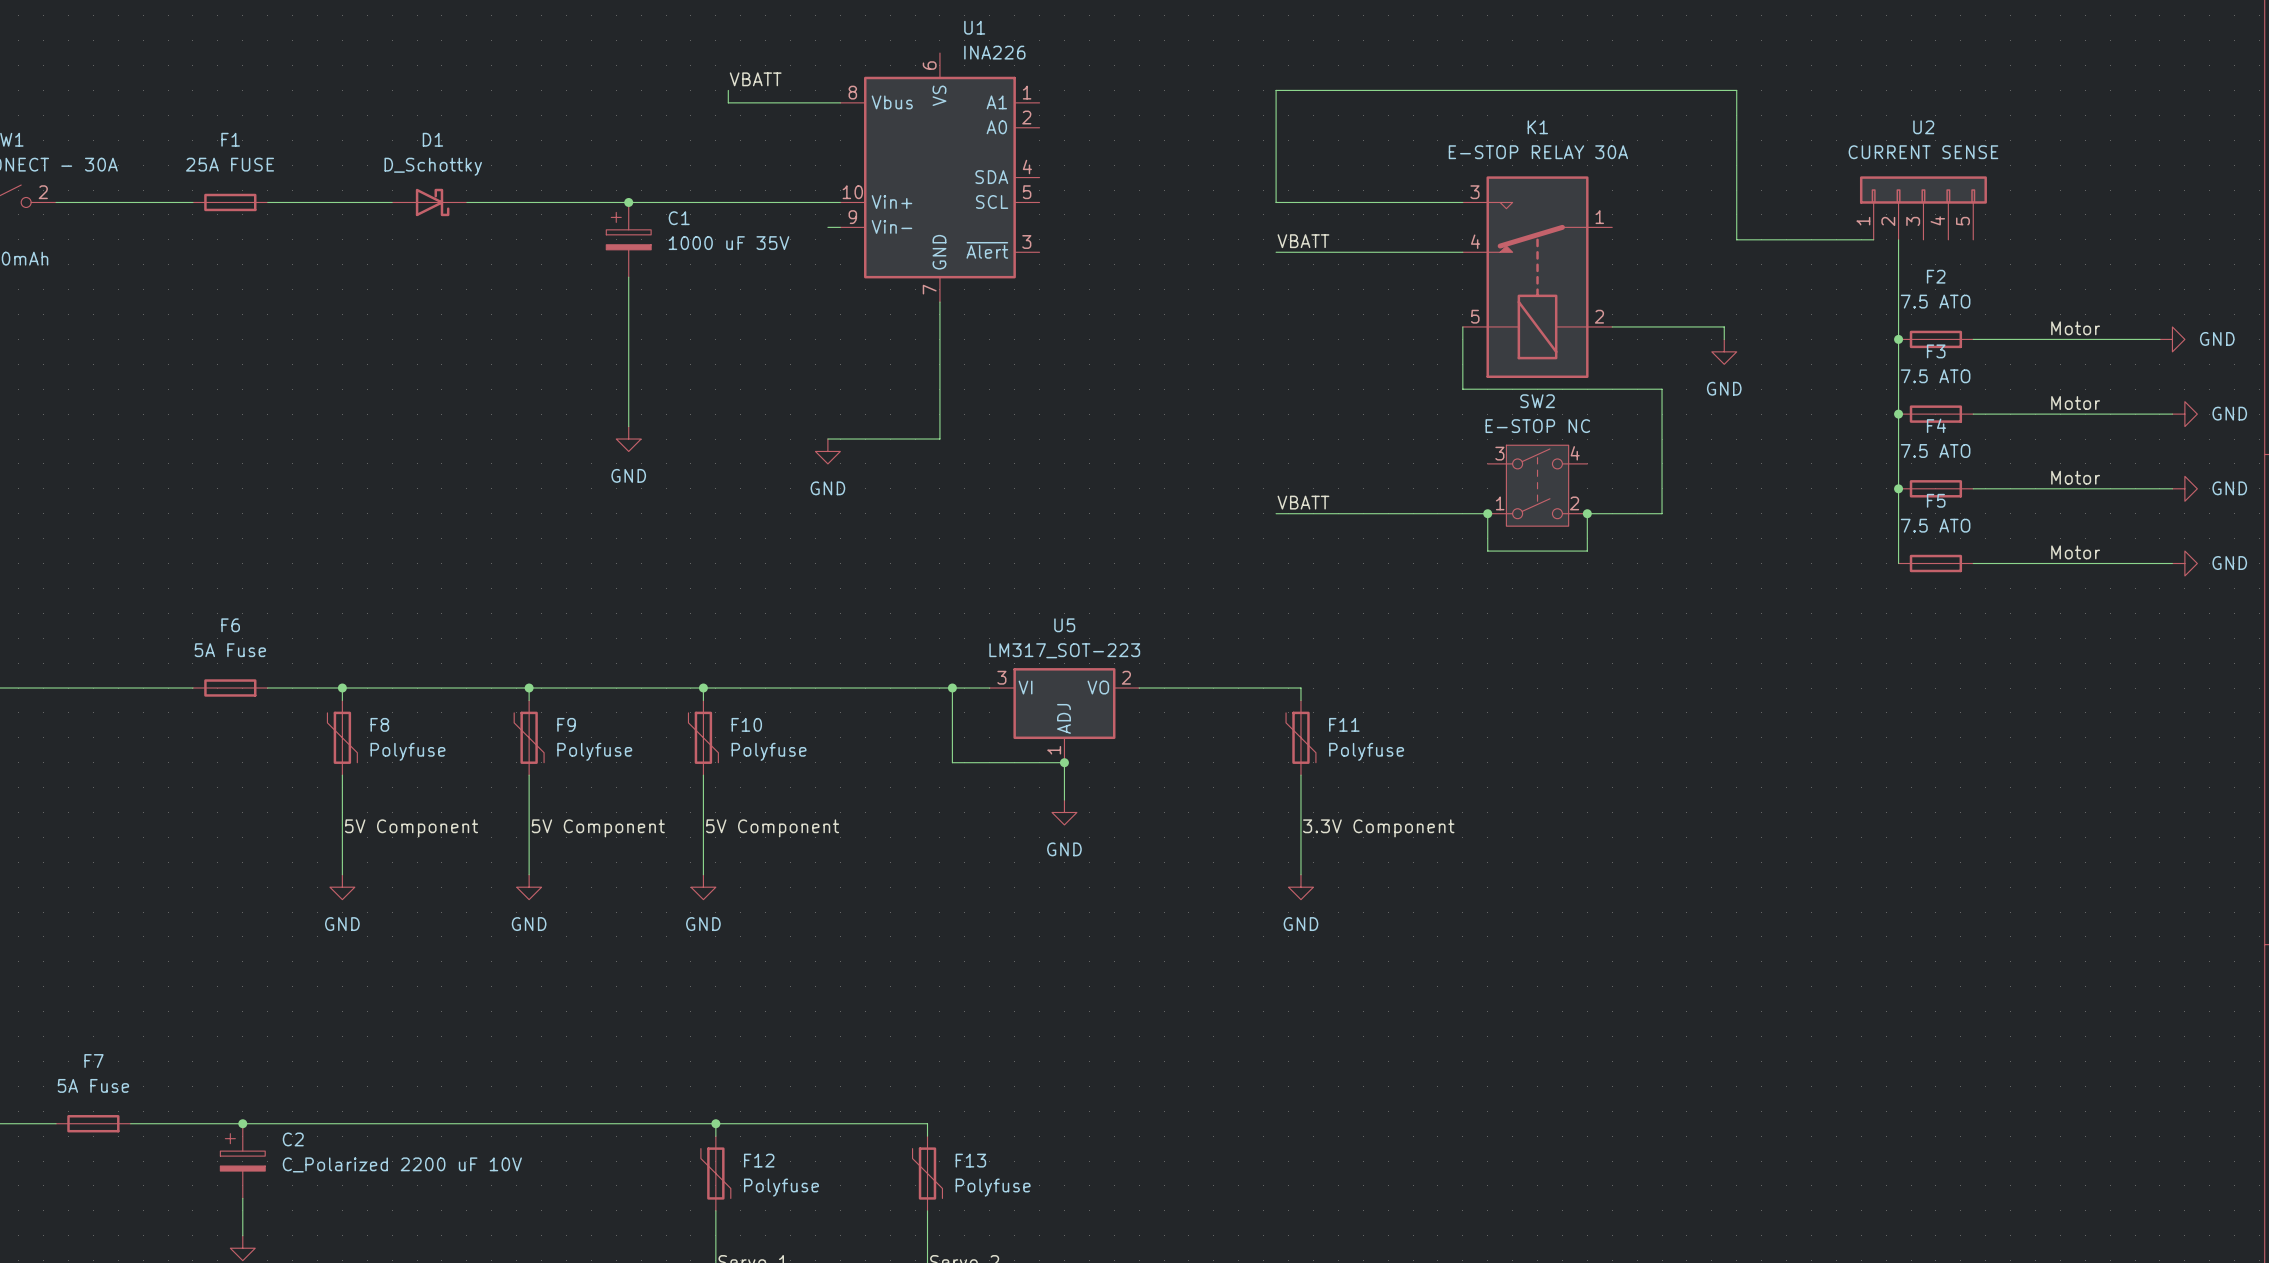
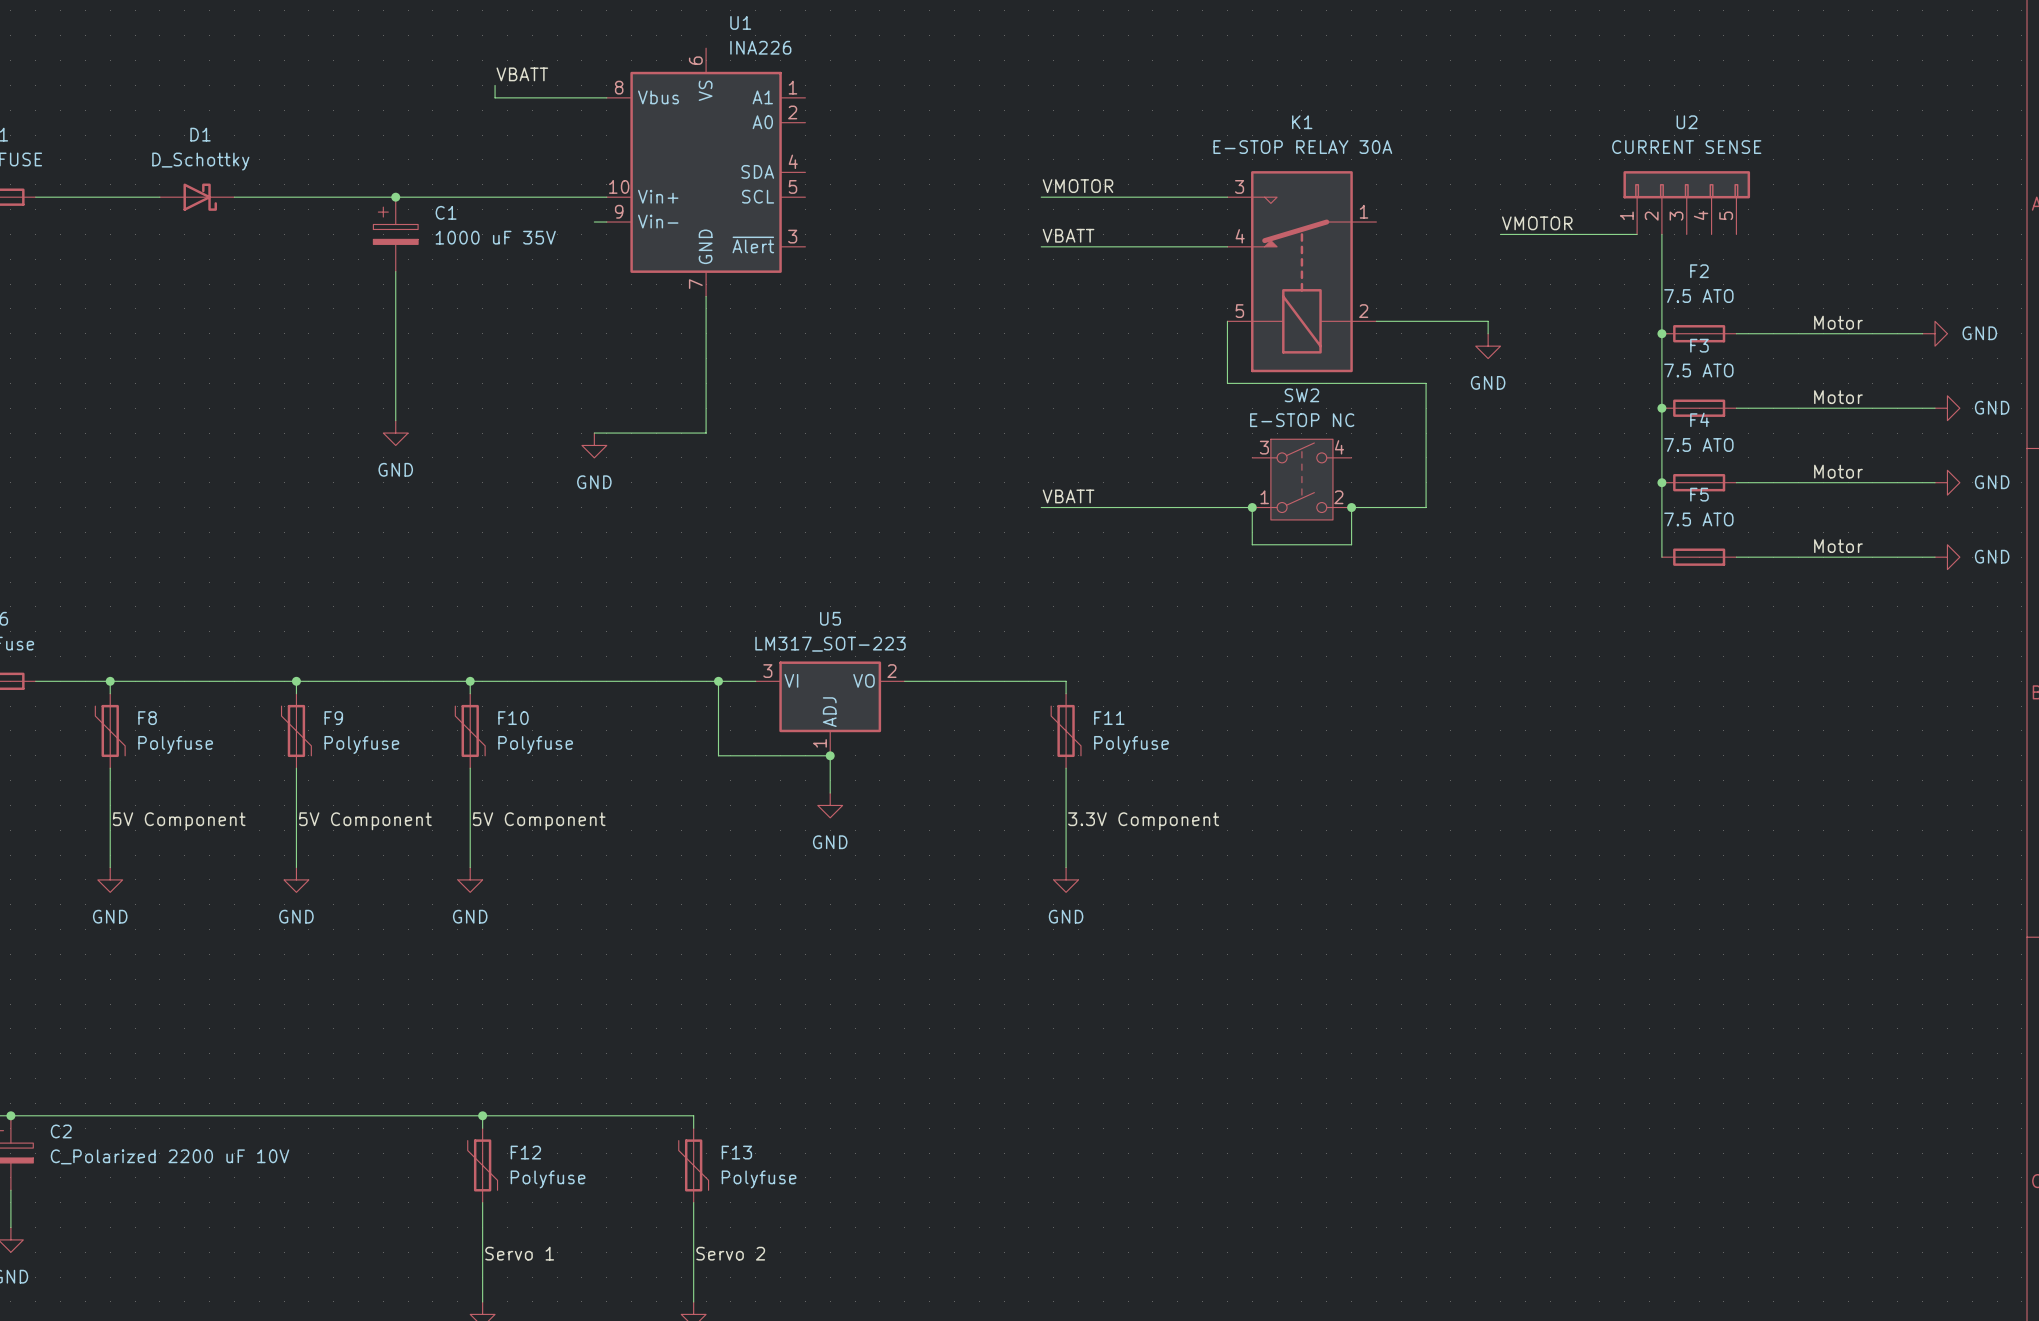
label: none -> VMOTOR (1077, 186)
wire: (1276, 202) (1276, 90) (1736, 90) (1736, 239) -> none
label: none -> VMOTOR (1537, 223)

